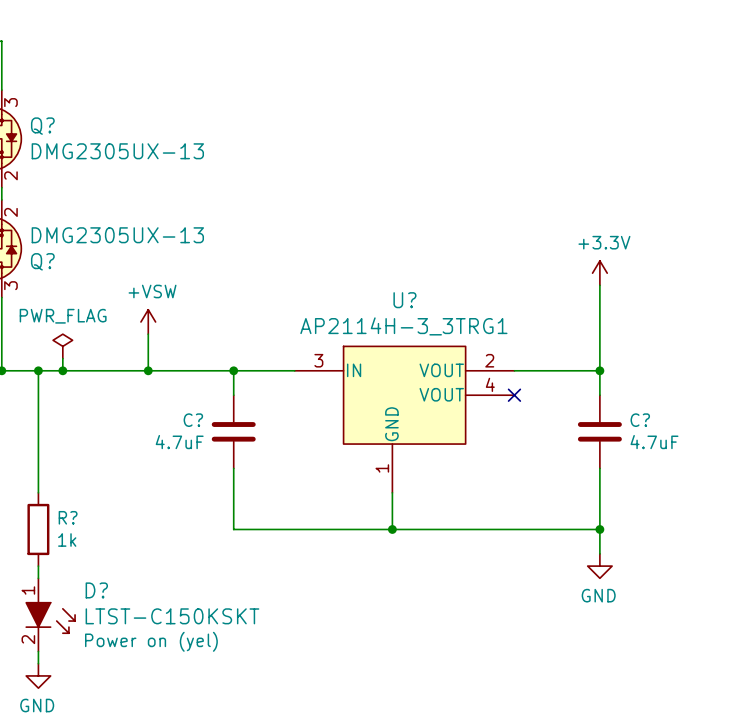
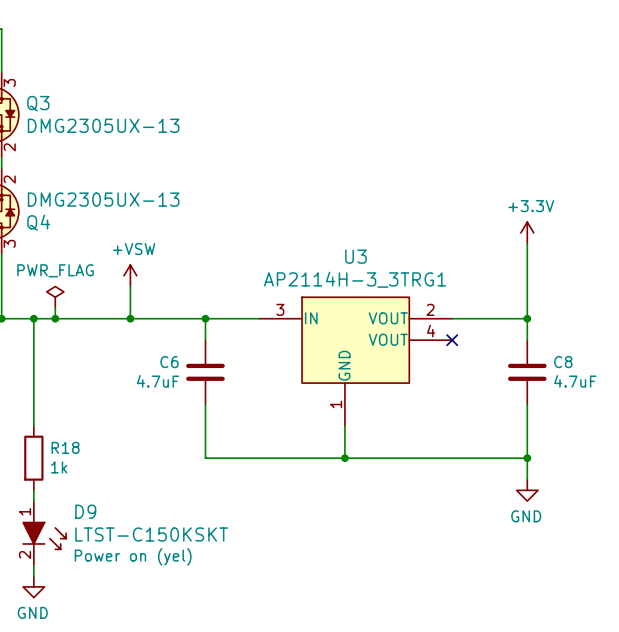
Q? name: Q? (42, 126) -> Q3 (38, 103)
Q? name: Q? (42, 261) -> Q4 (38, 222)
U? name: U? (404, 300) -> U3 (355, 256)
C? name: C? (193, 420) -> C6 (169, 362)
C? name: C? (640, 420) -> C8 (563, 362)
R? name: R? (68, 517) -> R18 (65, 447)
D? name: D? (96, 590) -> D9 (85, 511)

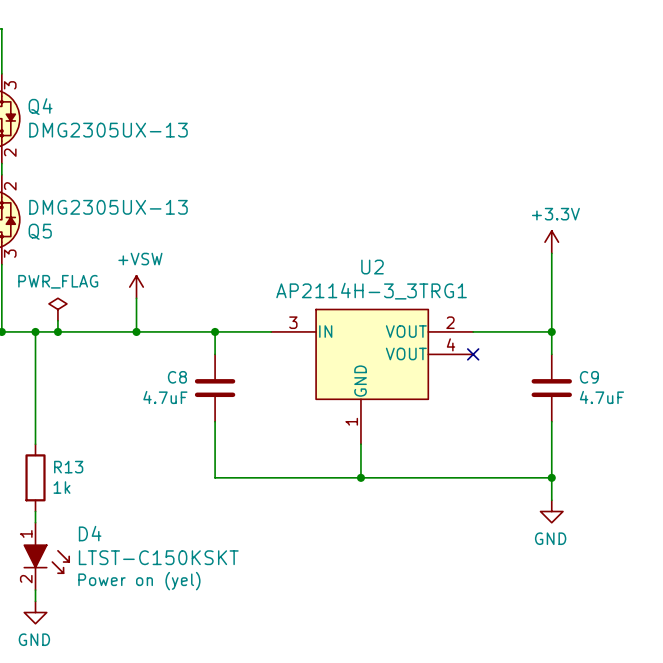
Q3 name: Q3 (38, 103) -> Q4 (40, 106)
Q4 name: Q4 (38, 222) -> Q5 (40, 231)
U3 name: U3 (355, 256) -> U2 (372, 267)
C6 name: C6 (169, 362) -> C8 (177, 377)
C8 name: C8 (563, 362) -> C9 (589, 377)
R18 name: R18 (65, 447) -> R13 (68, 467)
D9 name: D9 (85, 511) -> D4 (90, 533)

